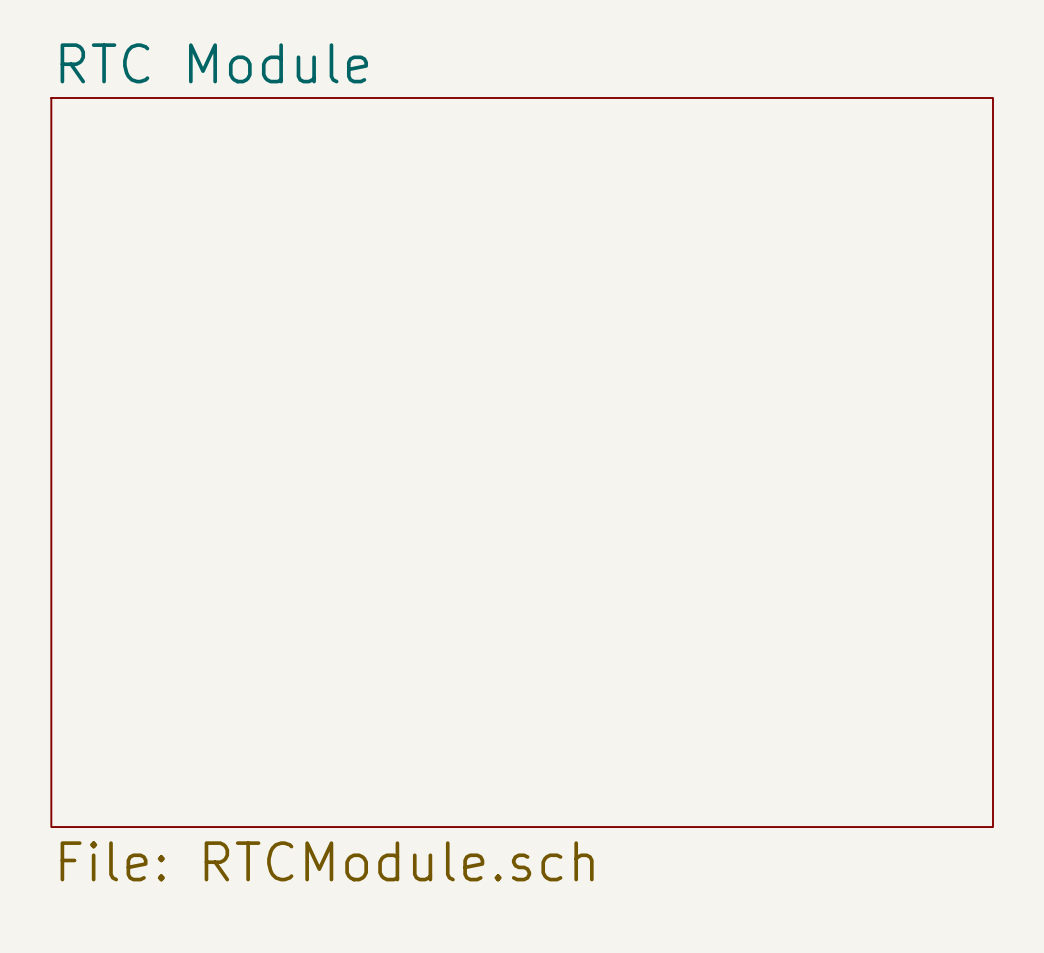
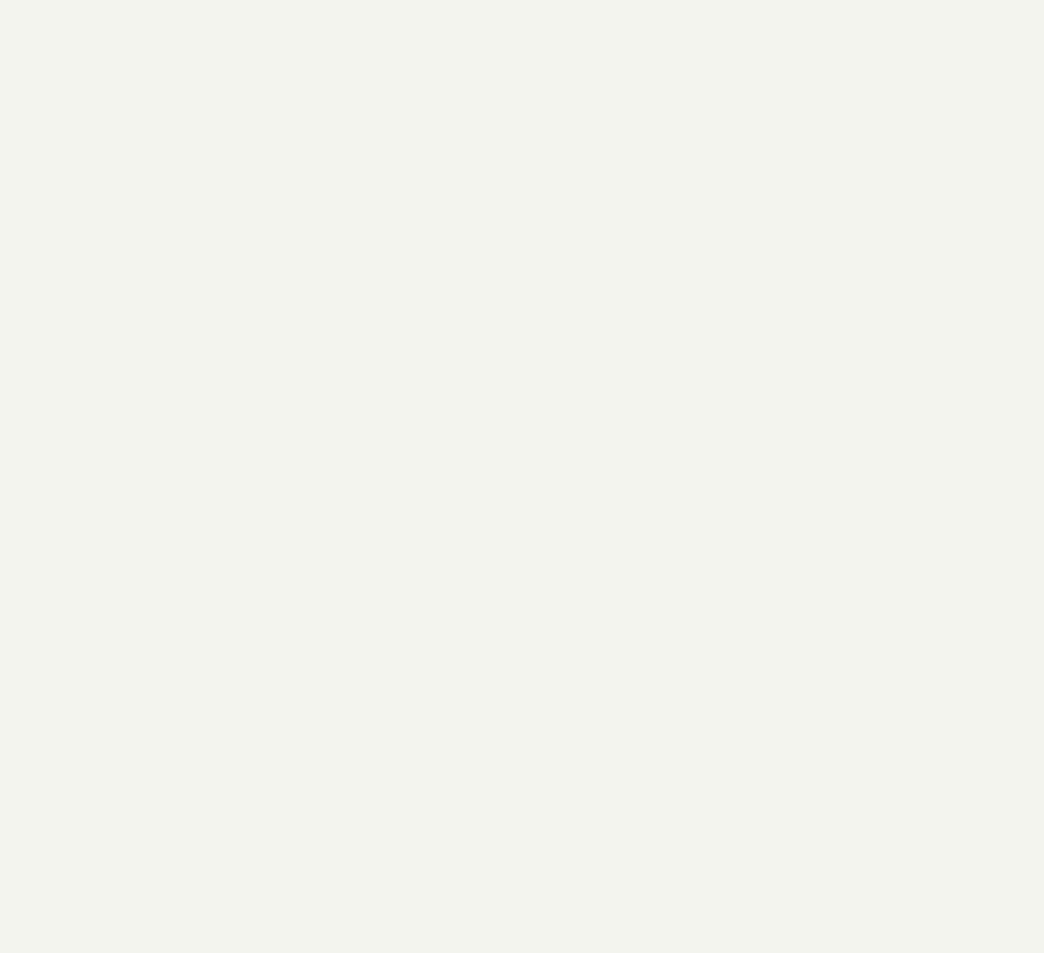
sheet RTC Module: File: RTCModule.sch (522, 462) -> none

